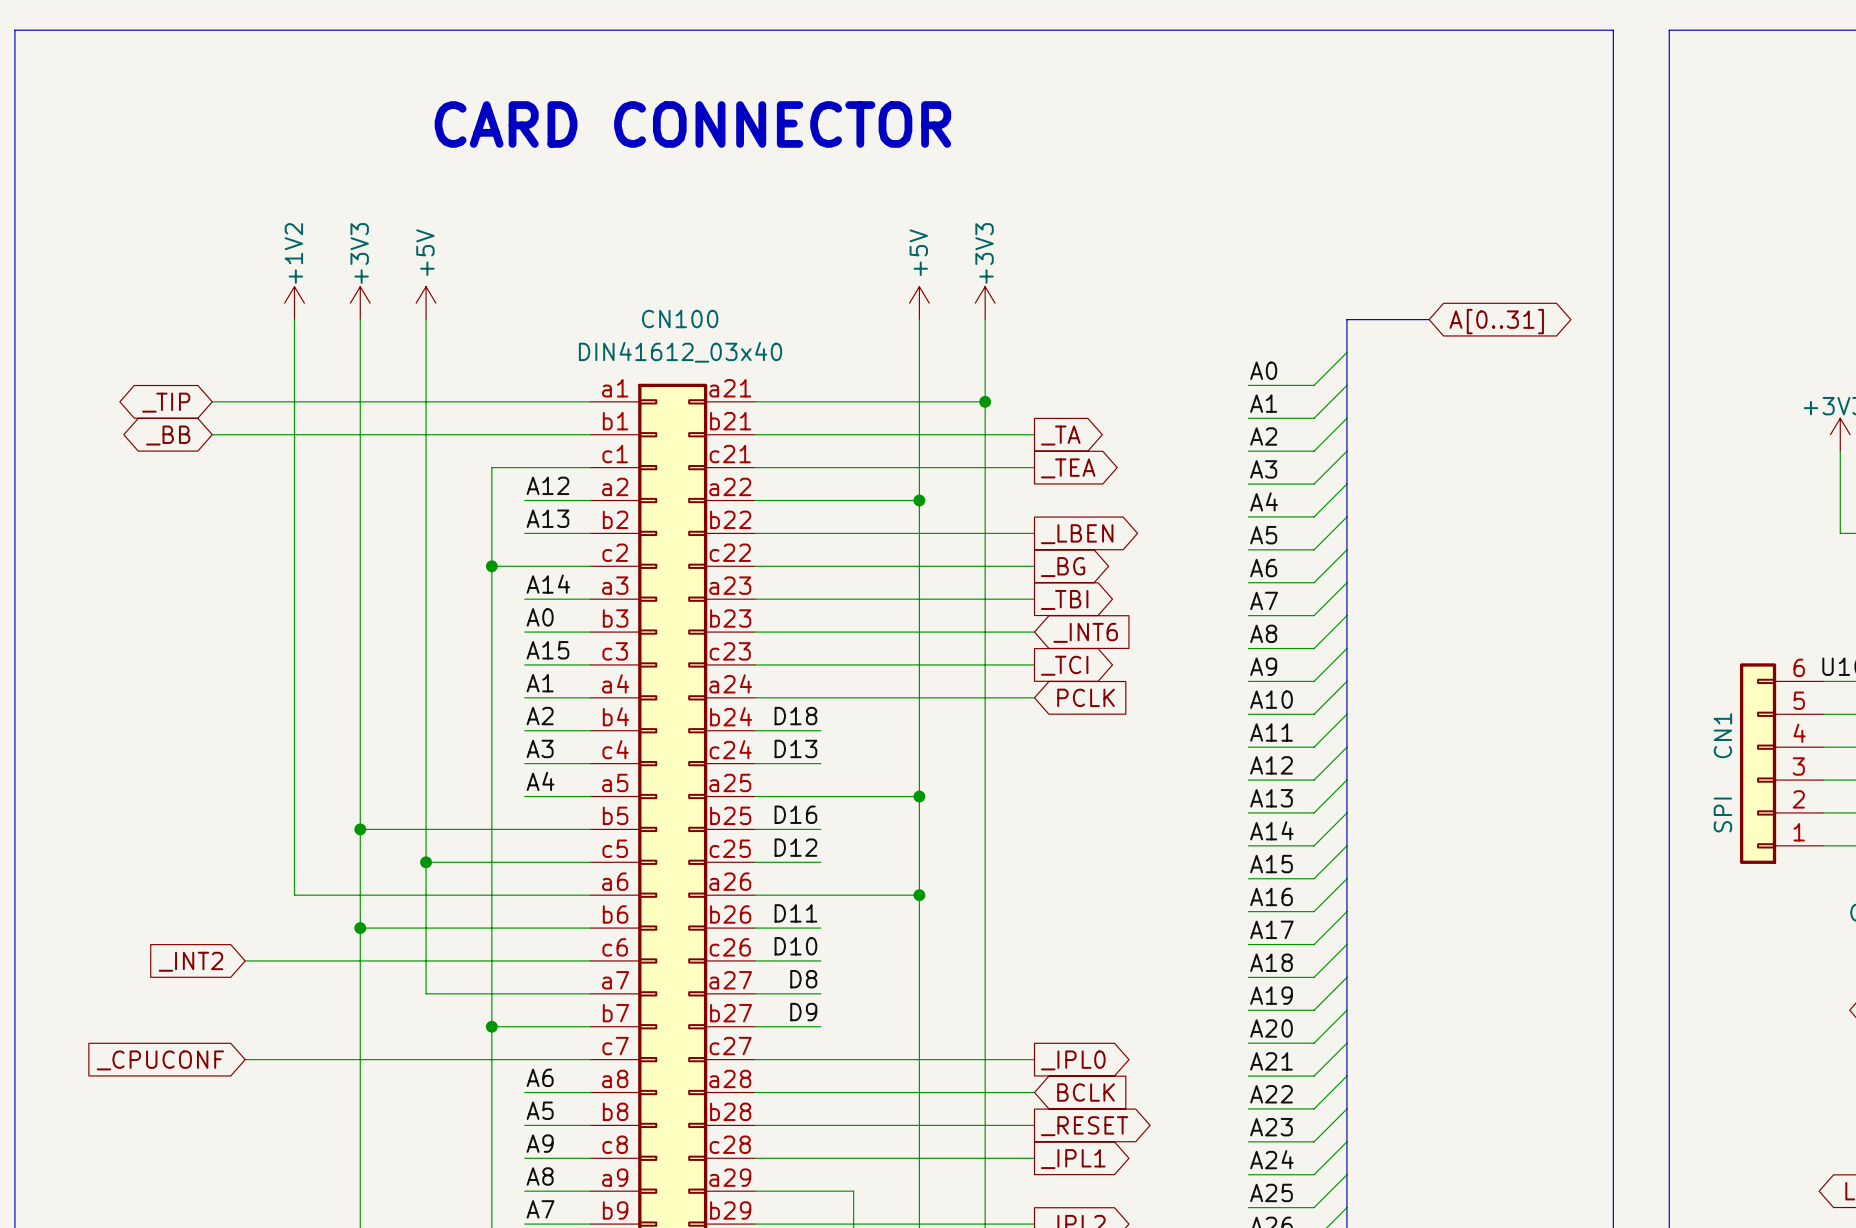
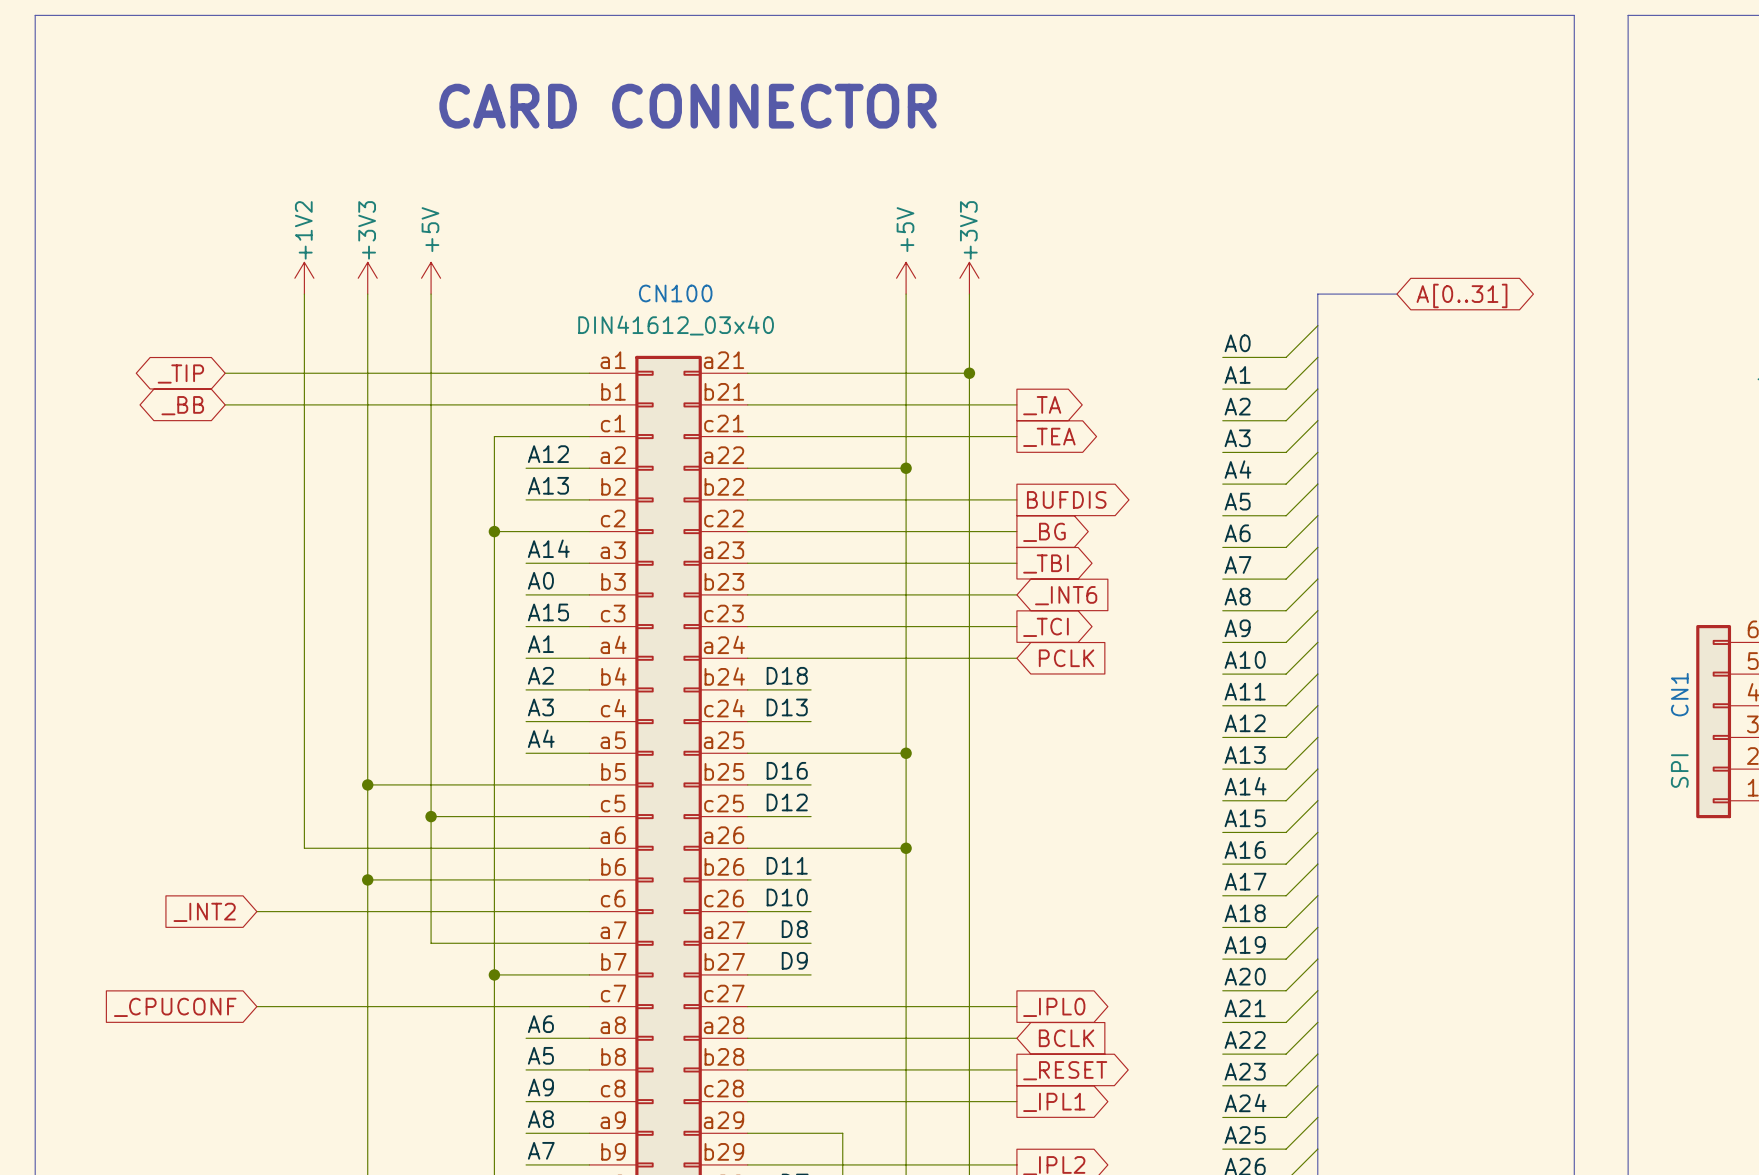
global label: _LBEN (1077, 534) -> BUFDIS (1066, 499)

